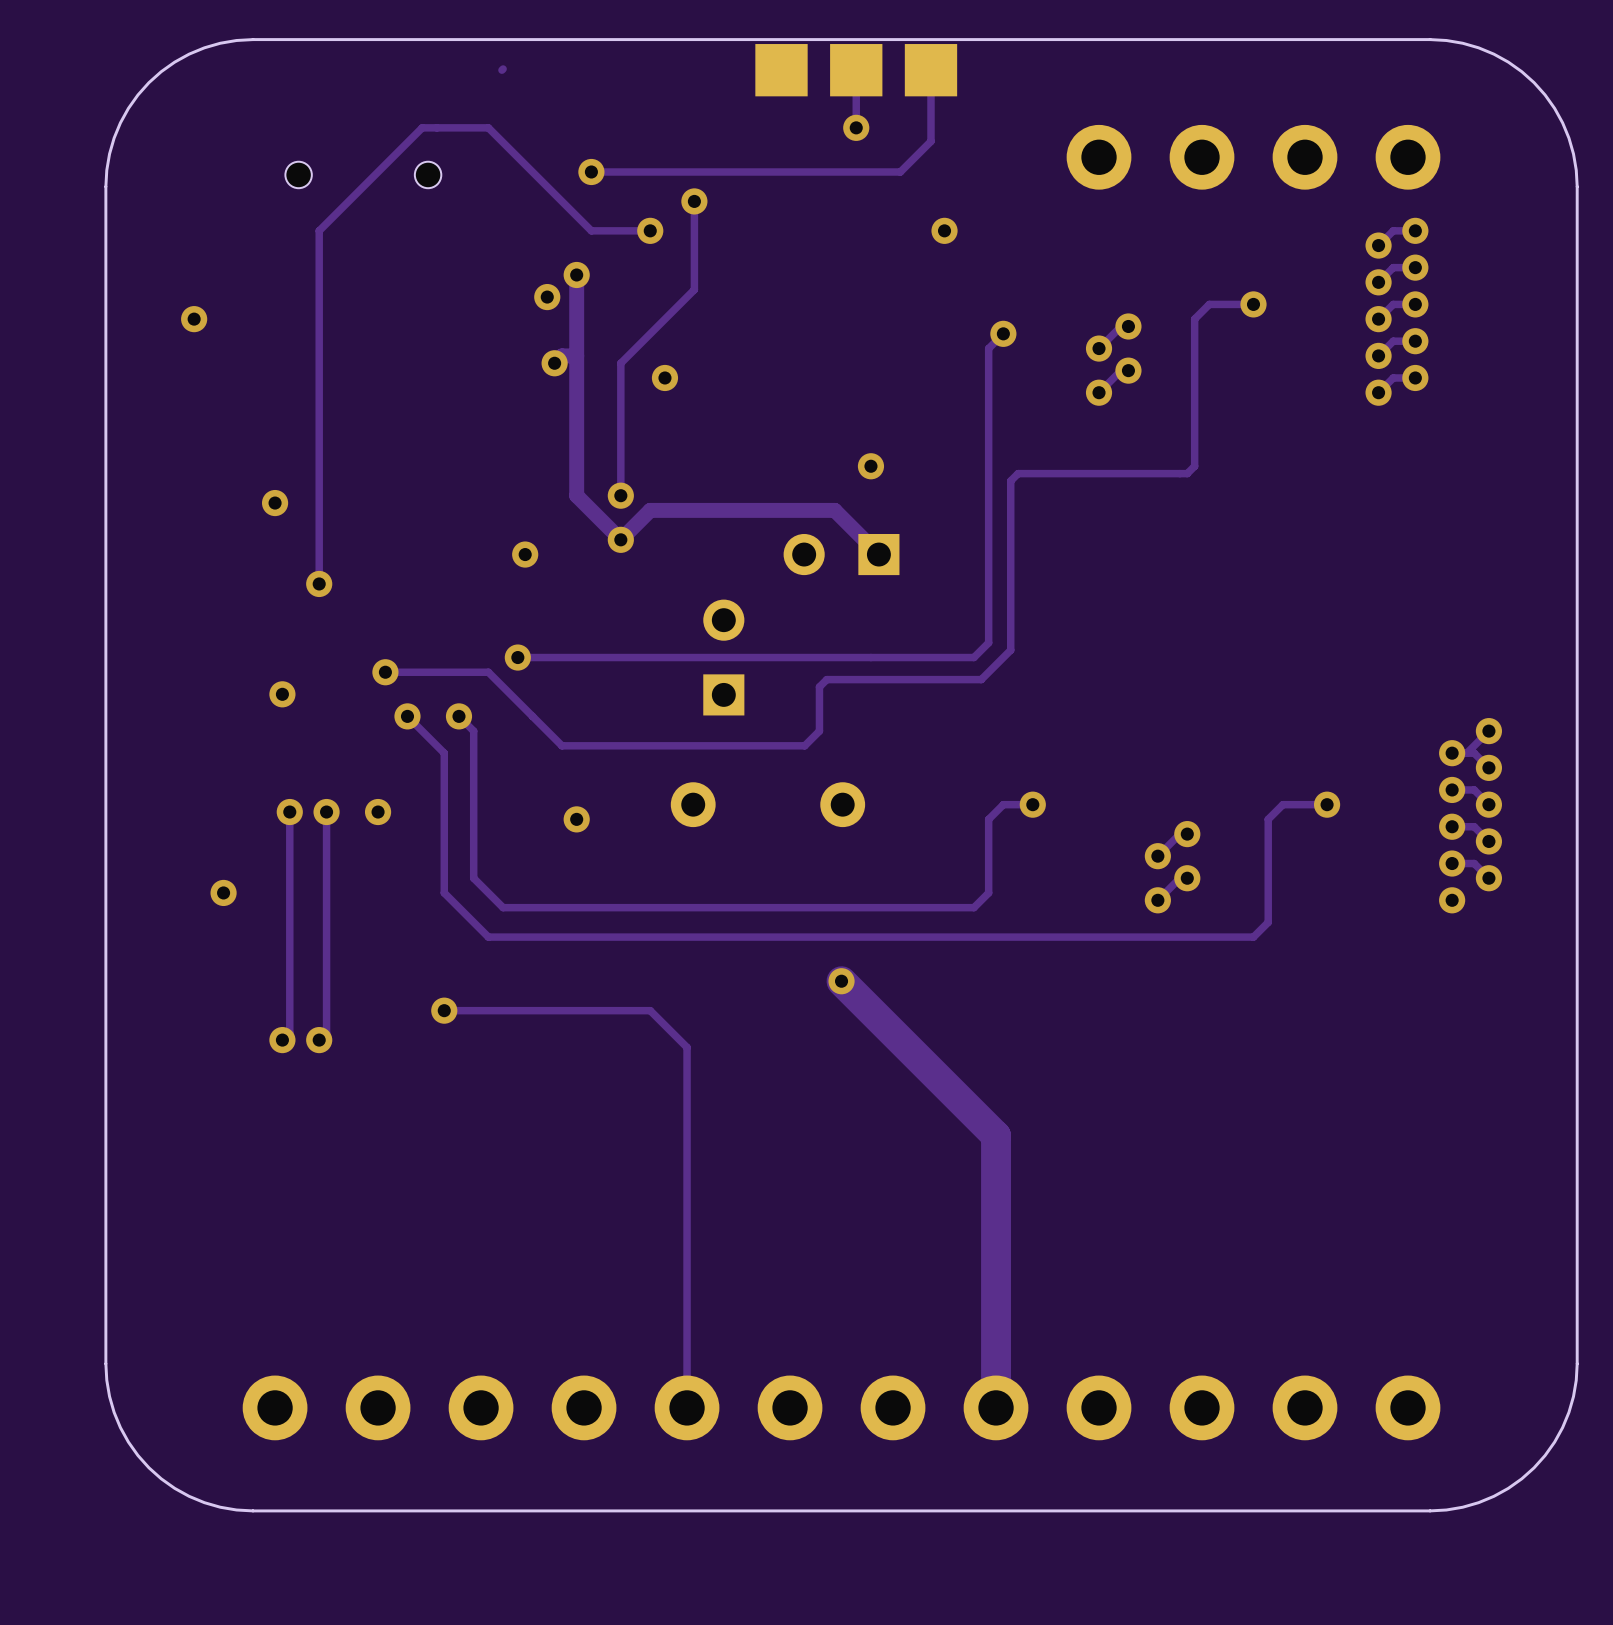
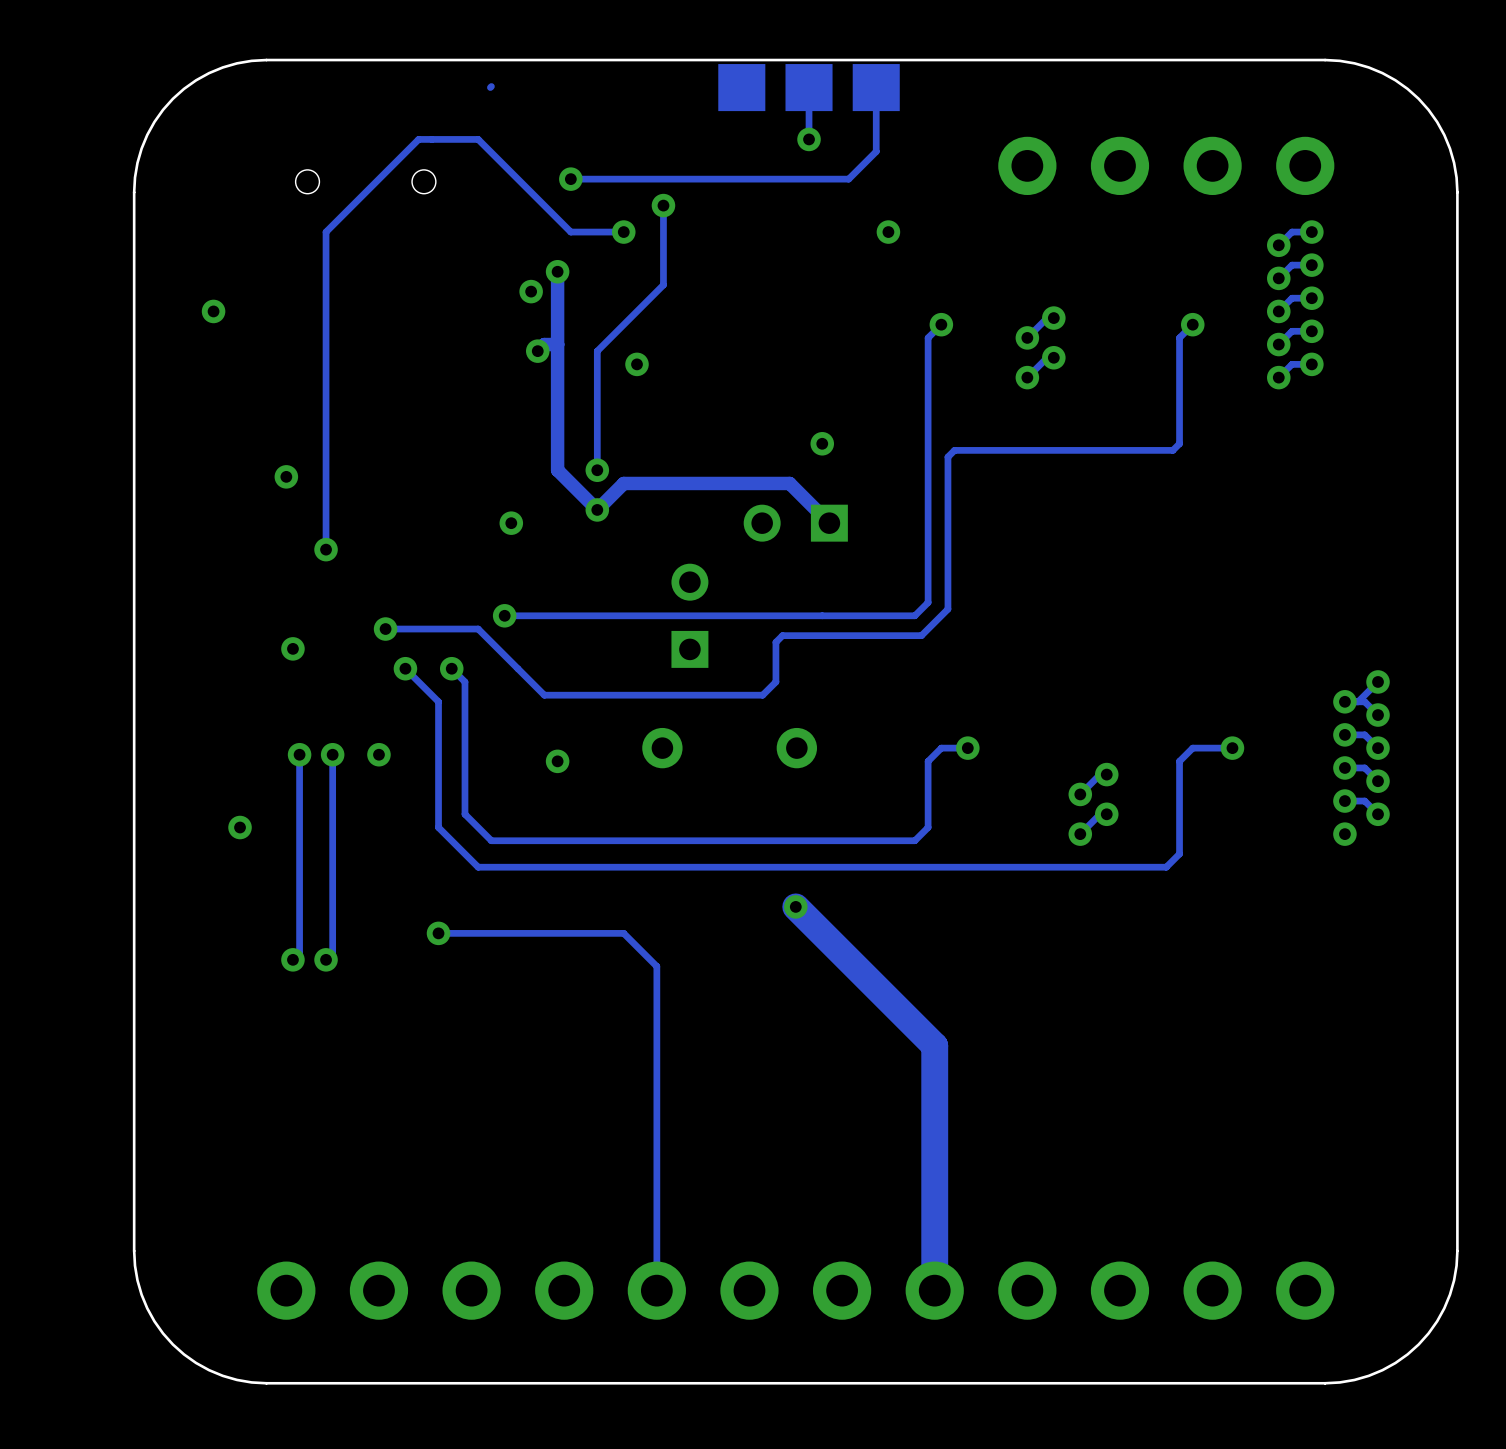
track: (1253, 304) (1209, 304) (1194, 319) (1194, 466) (1187, 473) -> (1192, 324) (1179, 337) (1179, 443) (1172, 450) (1106, 450)
via position: (1253, 304) -> (1192, 324)

